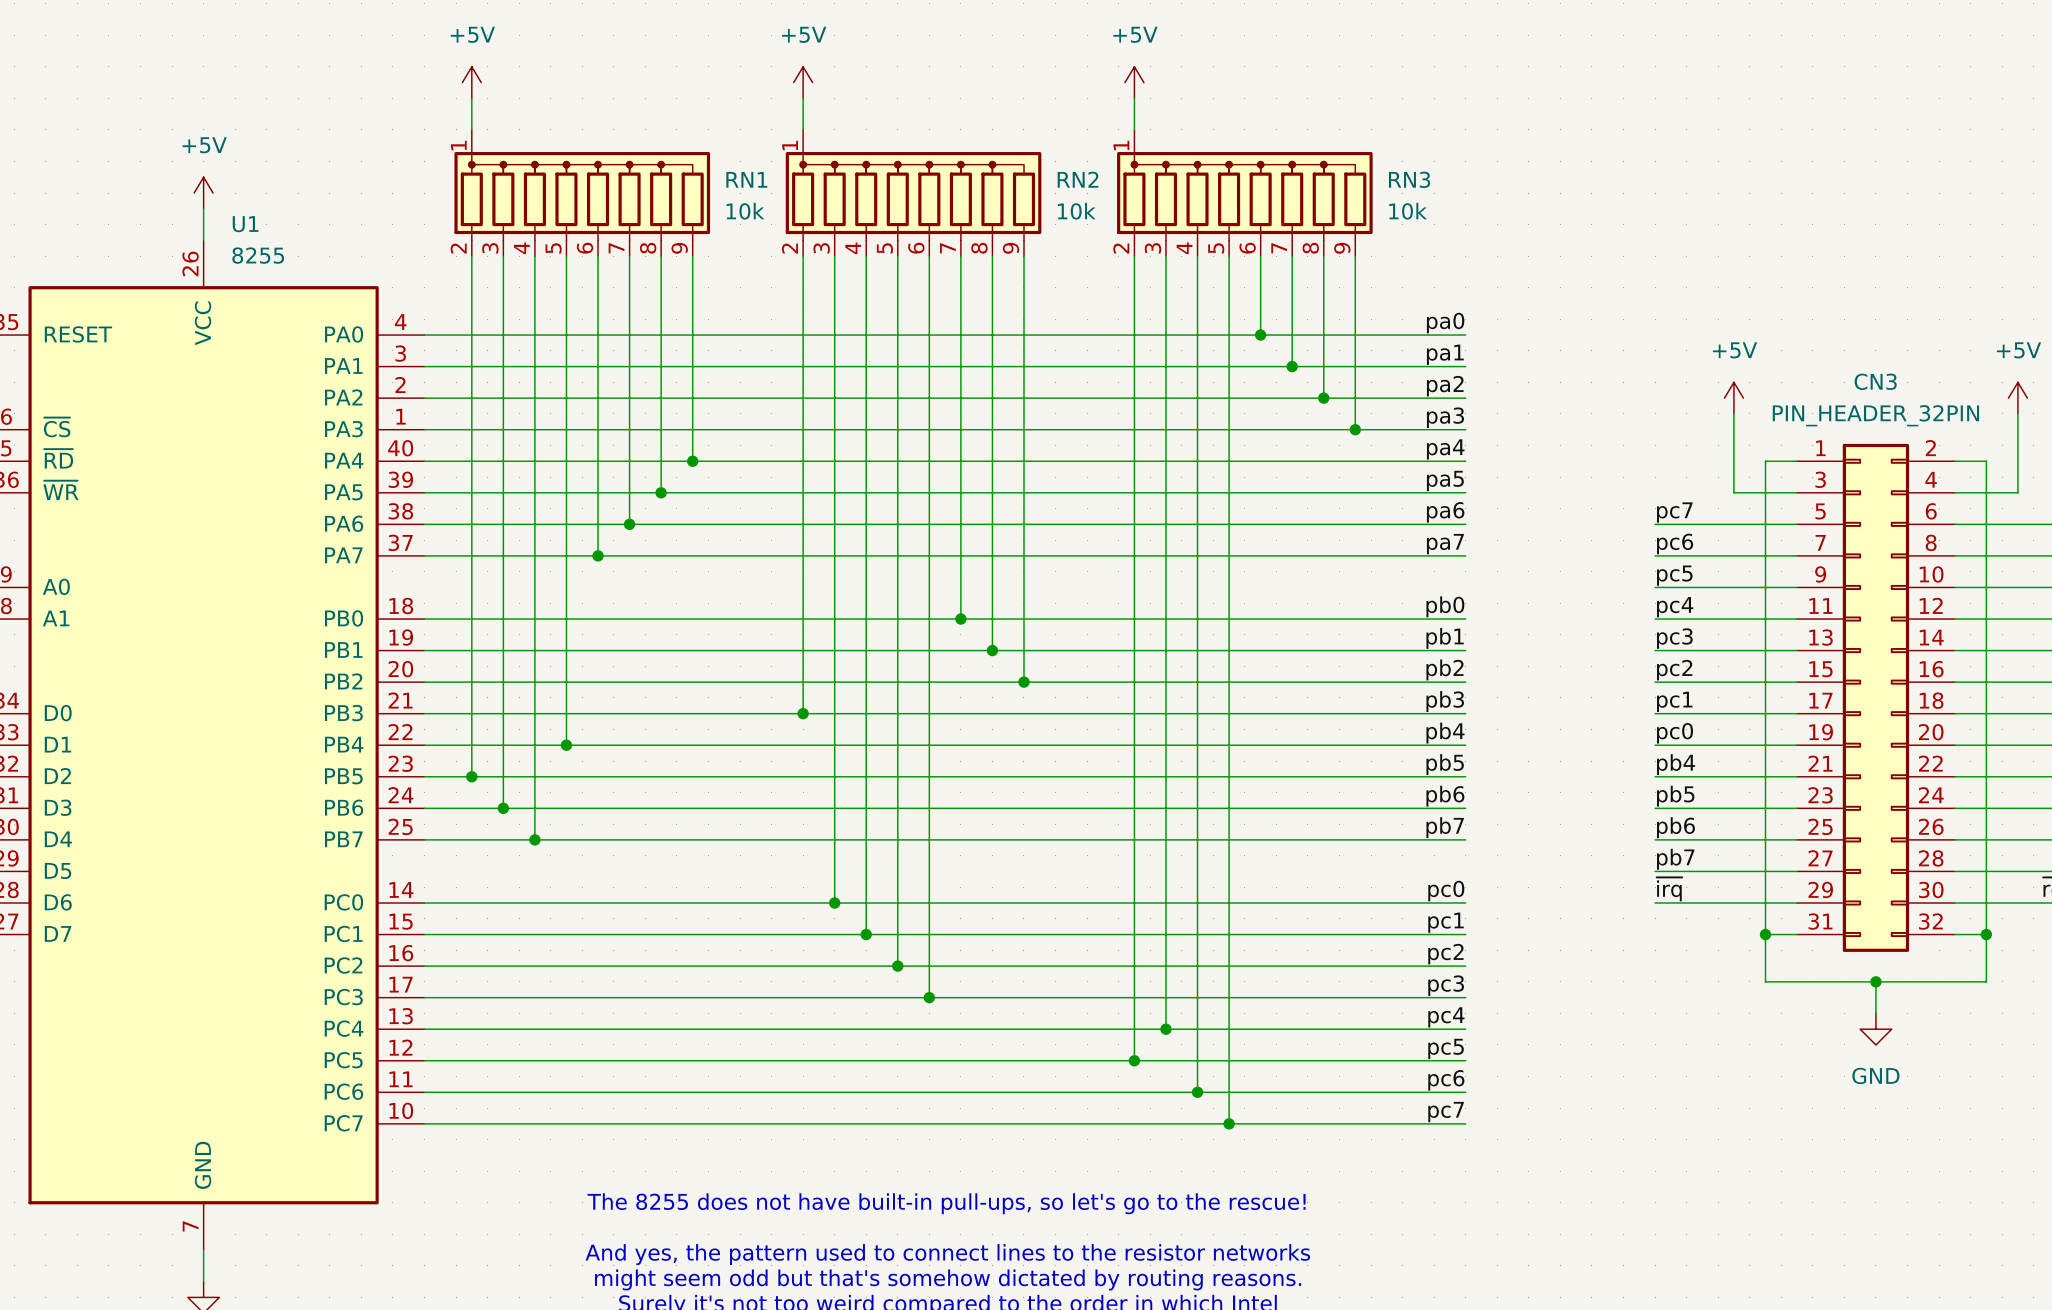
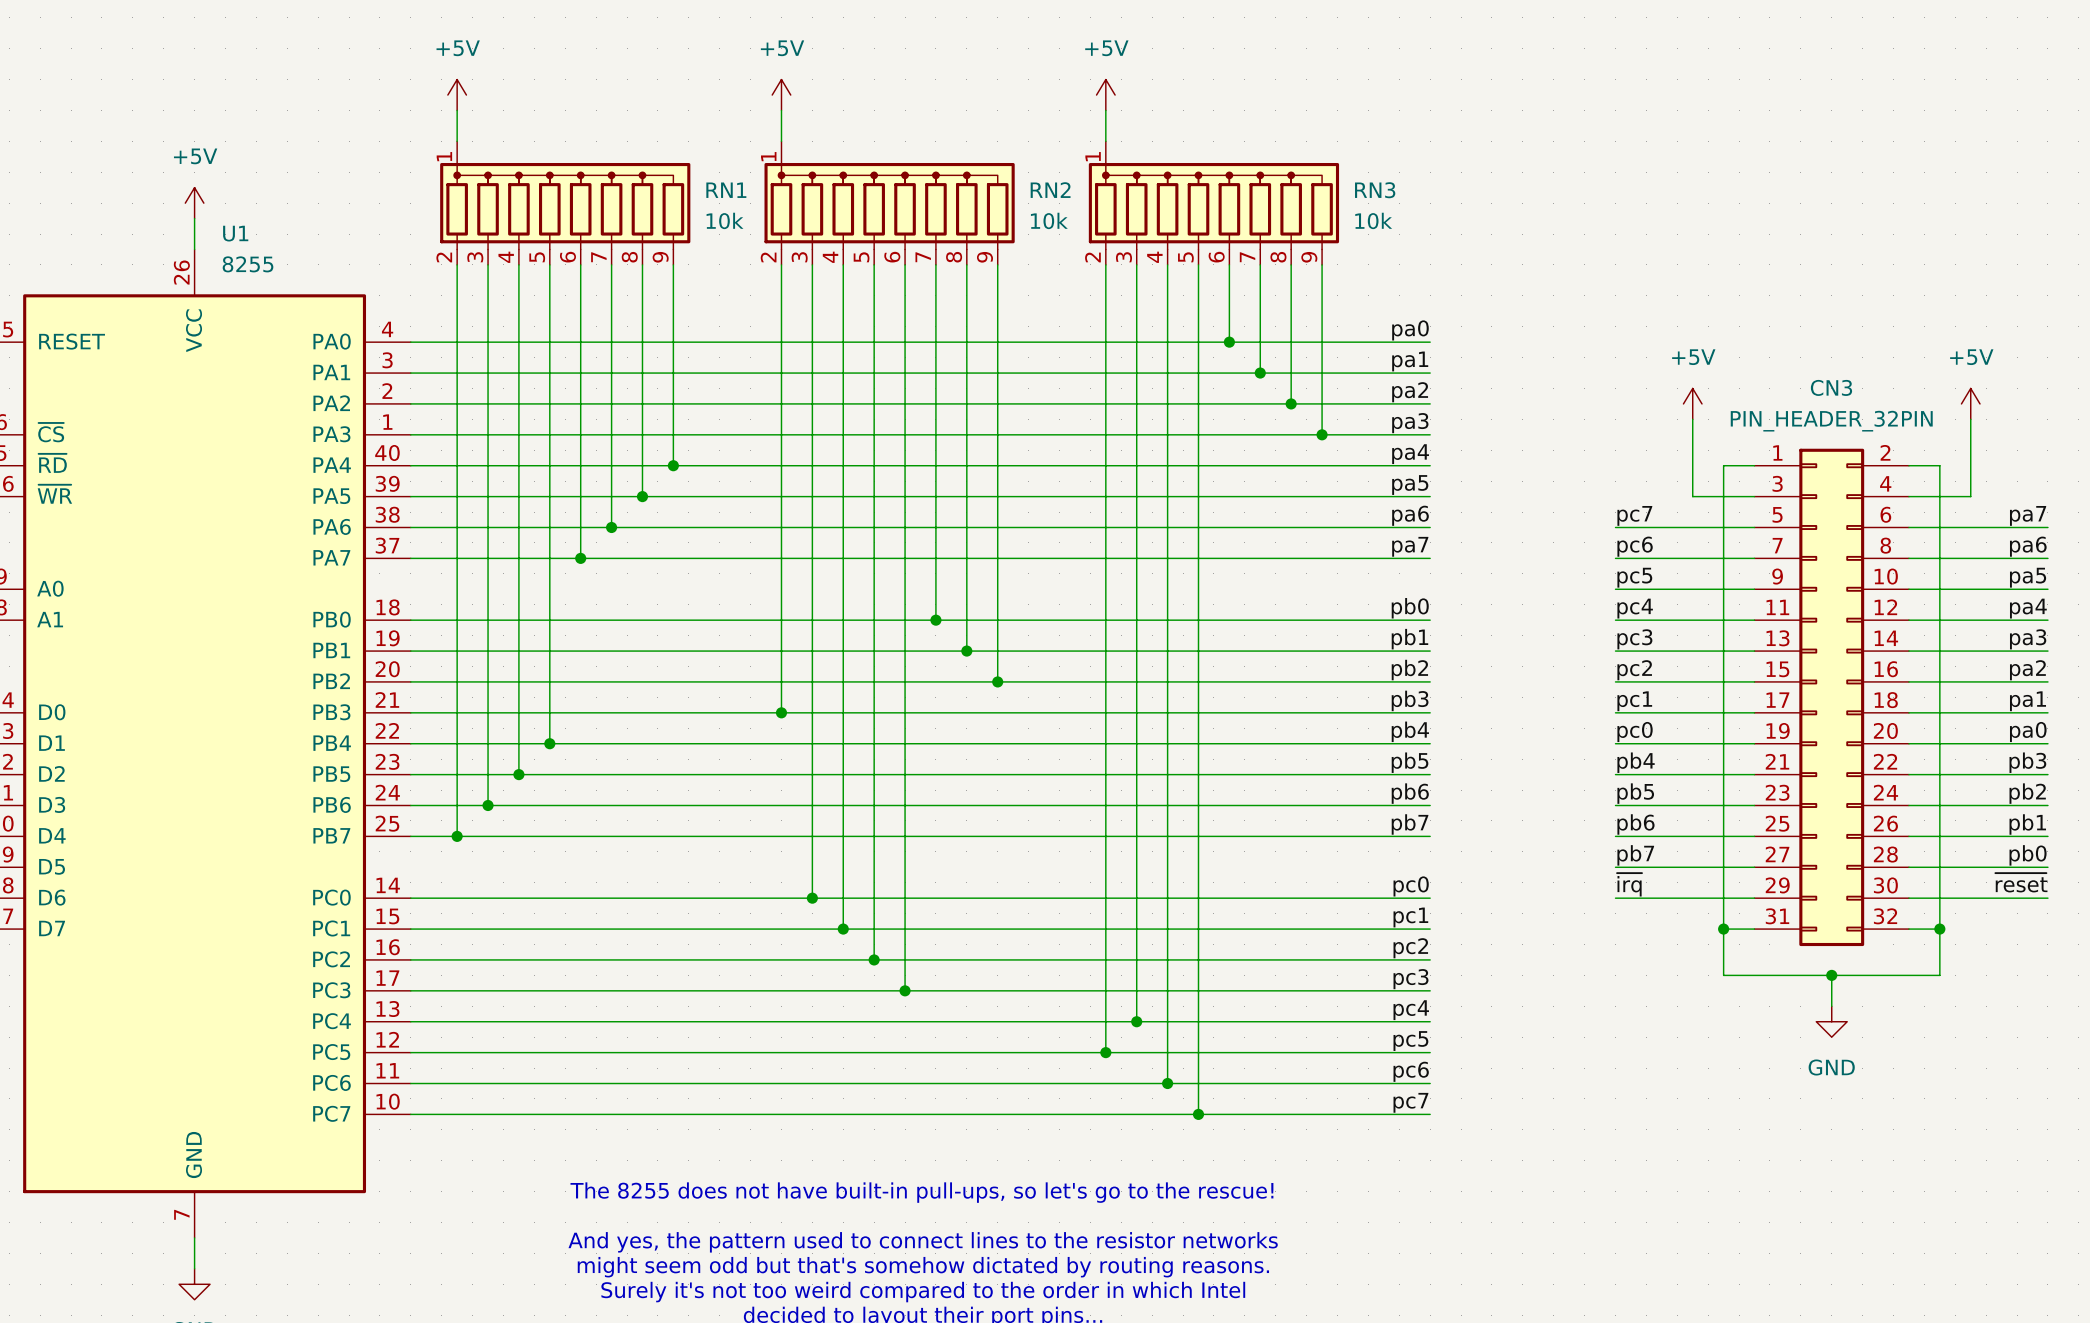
junction: (471, 776) -> none
wire: (534, 776) (534, 839) -> (457, 774) (457, 836)
junction: none -> (518, 774)
junction: none -> (457, 836)
junction: (534, 839) -> none

